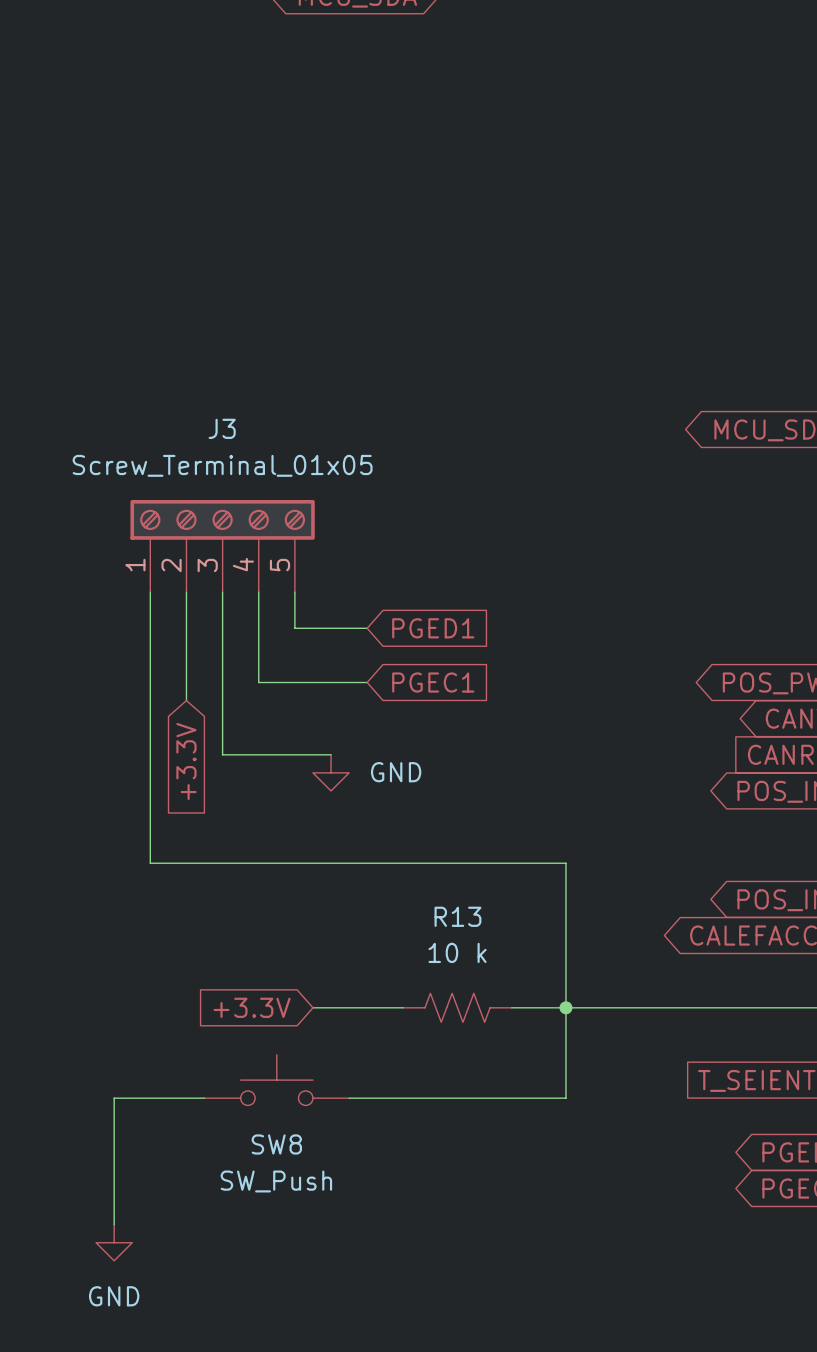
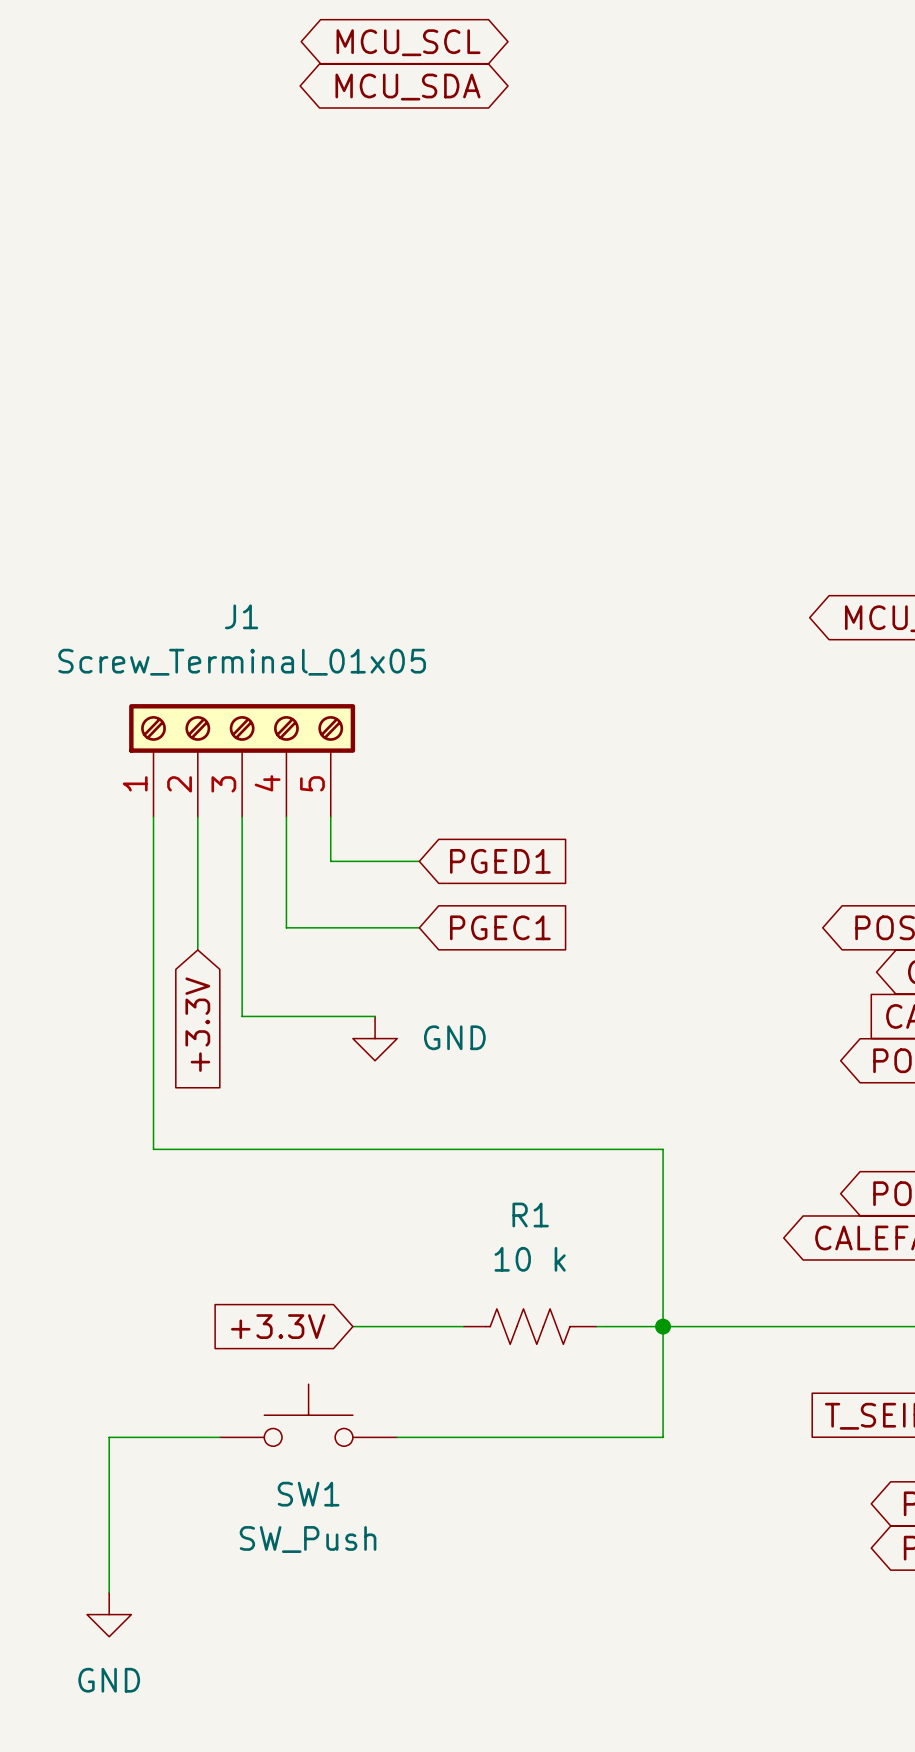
J3 name: J3 (222, 428) -> J1 (241, 616)
R13 name: R13 (457, 916) -> R1 (530, 1215)
SW8 name: SW8 (276, 1144) -> SW1 (308, 1494)

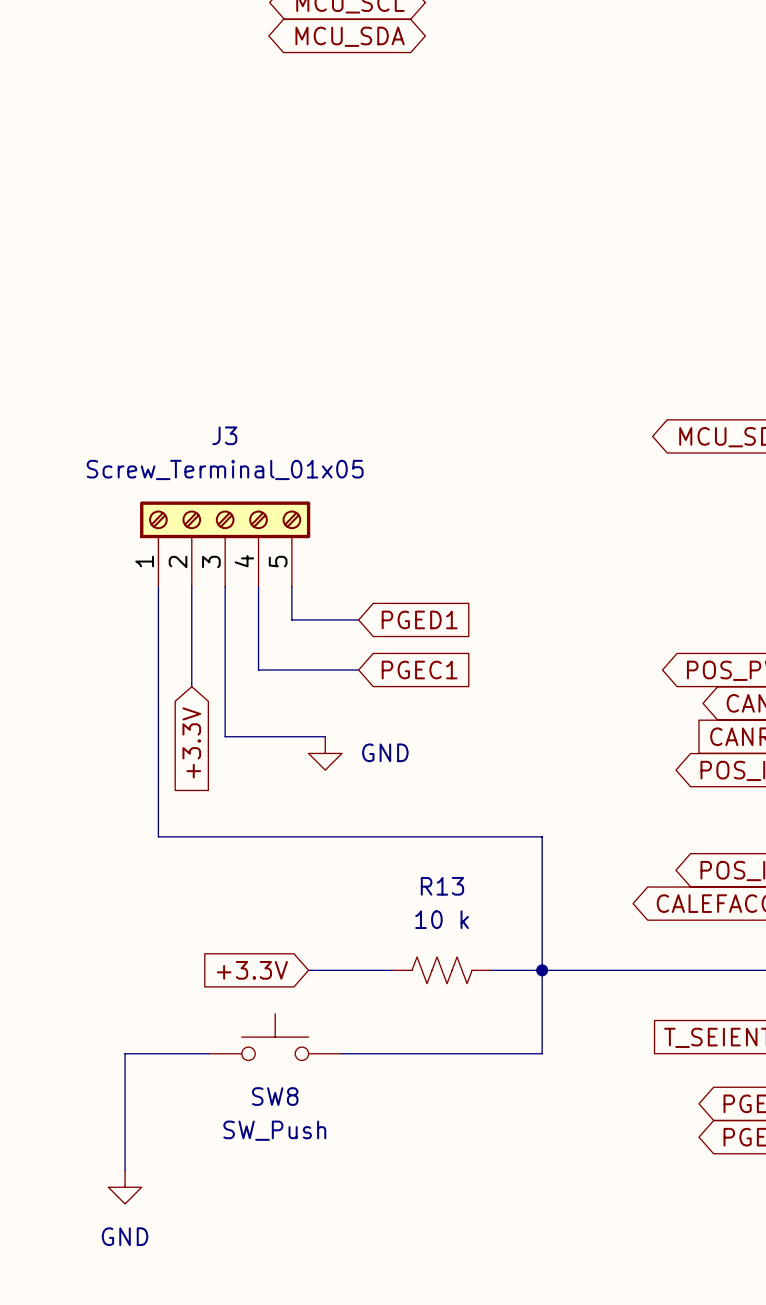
J1 name: J1 (241, 616) -> J3 (224, 435)
R1 name: R1 (530, 1215) -> R13 (442, 886)
SW1 name: SW1 (308, 1494) -> SW8 (275, 1096)

